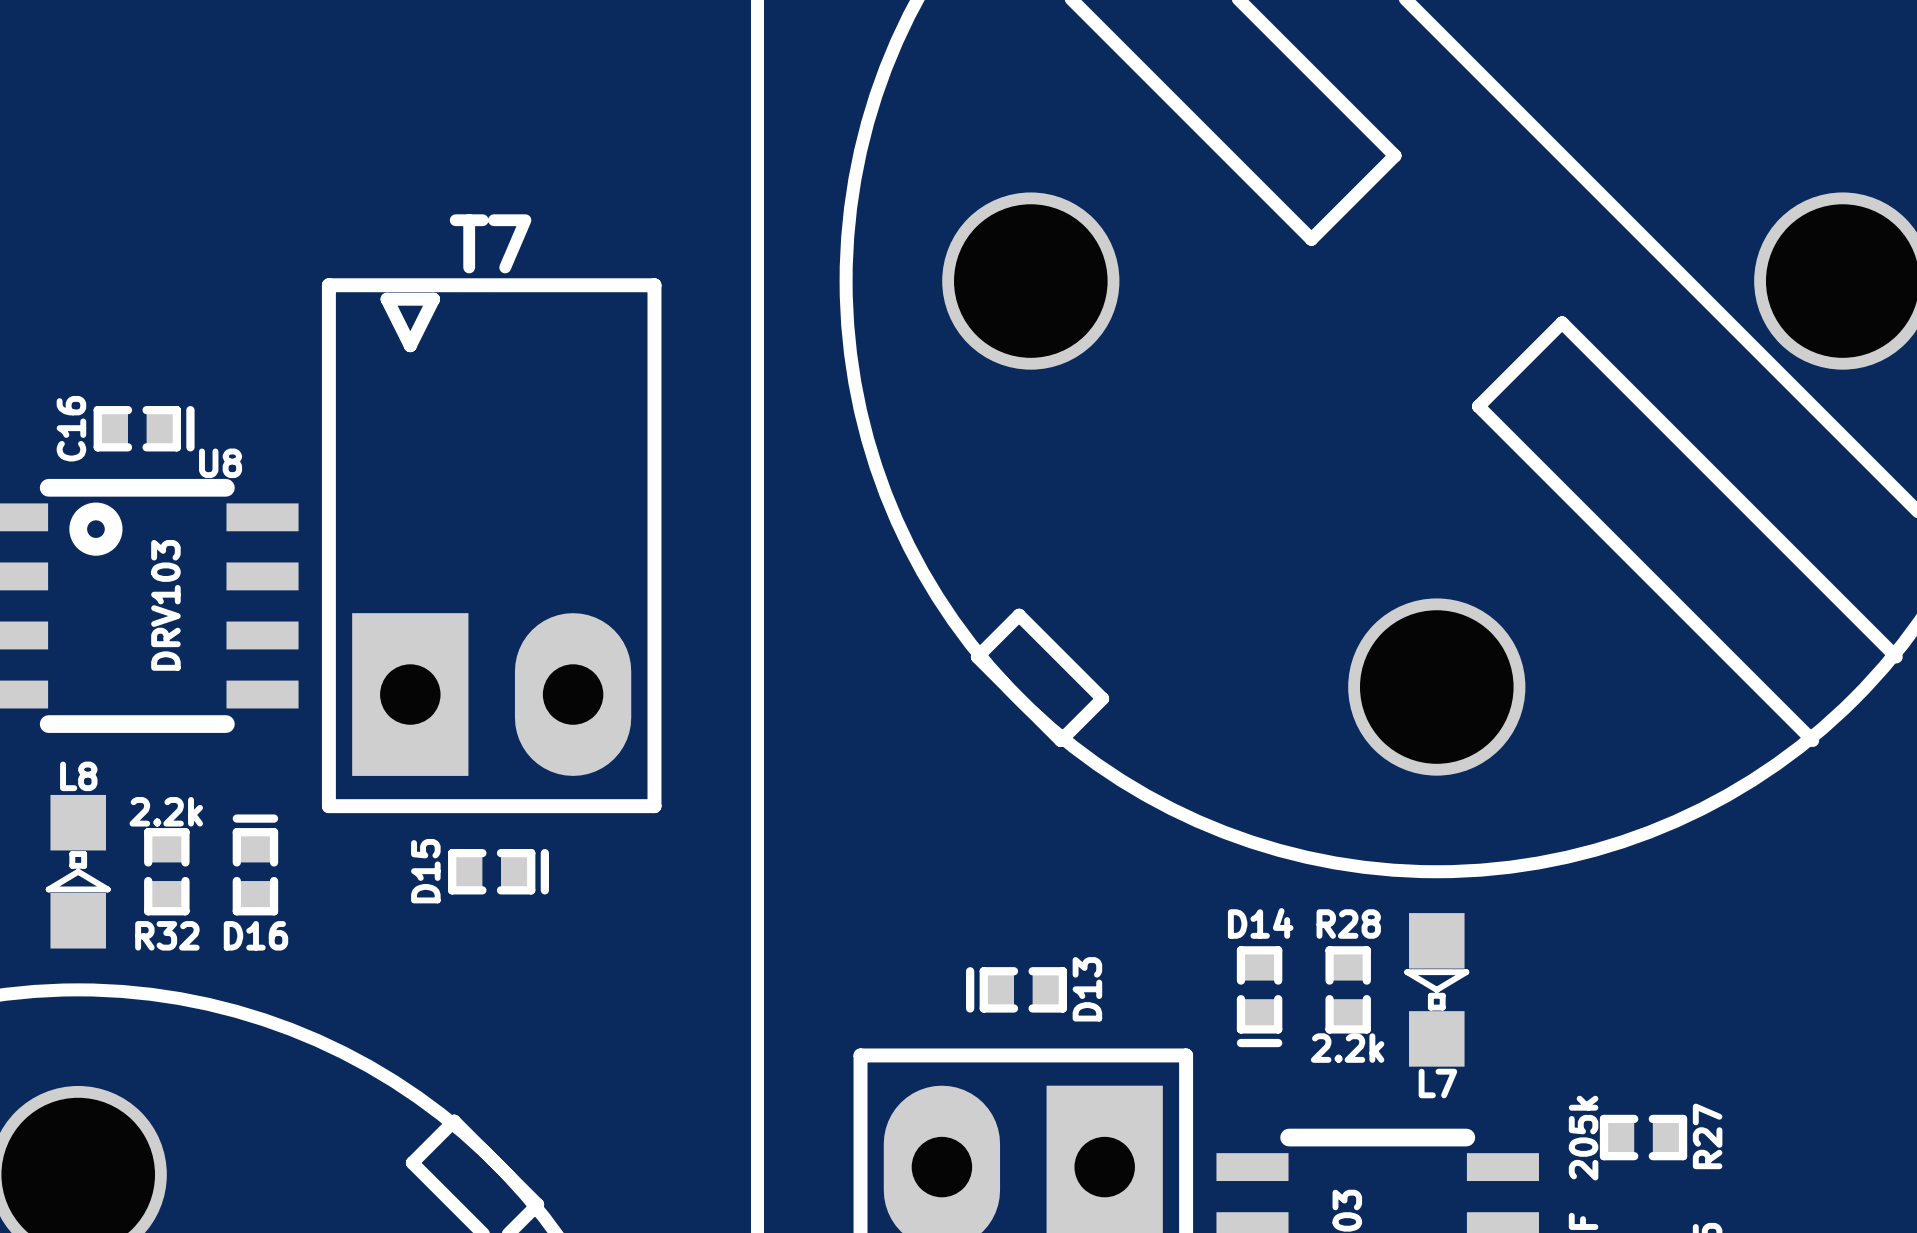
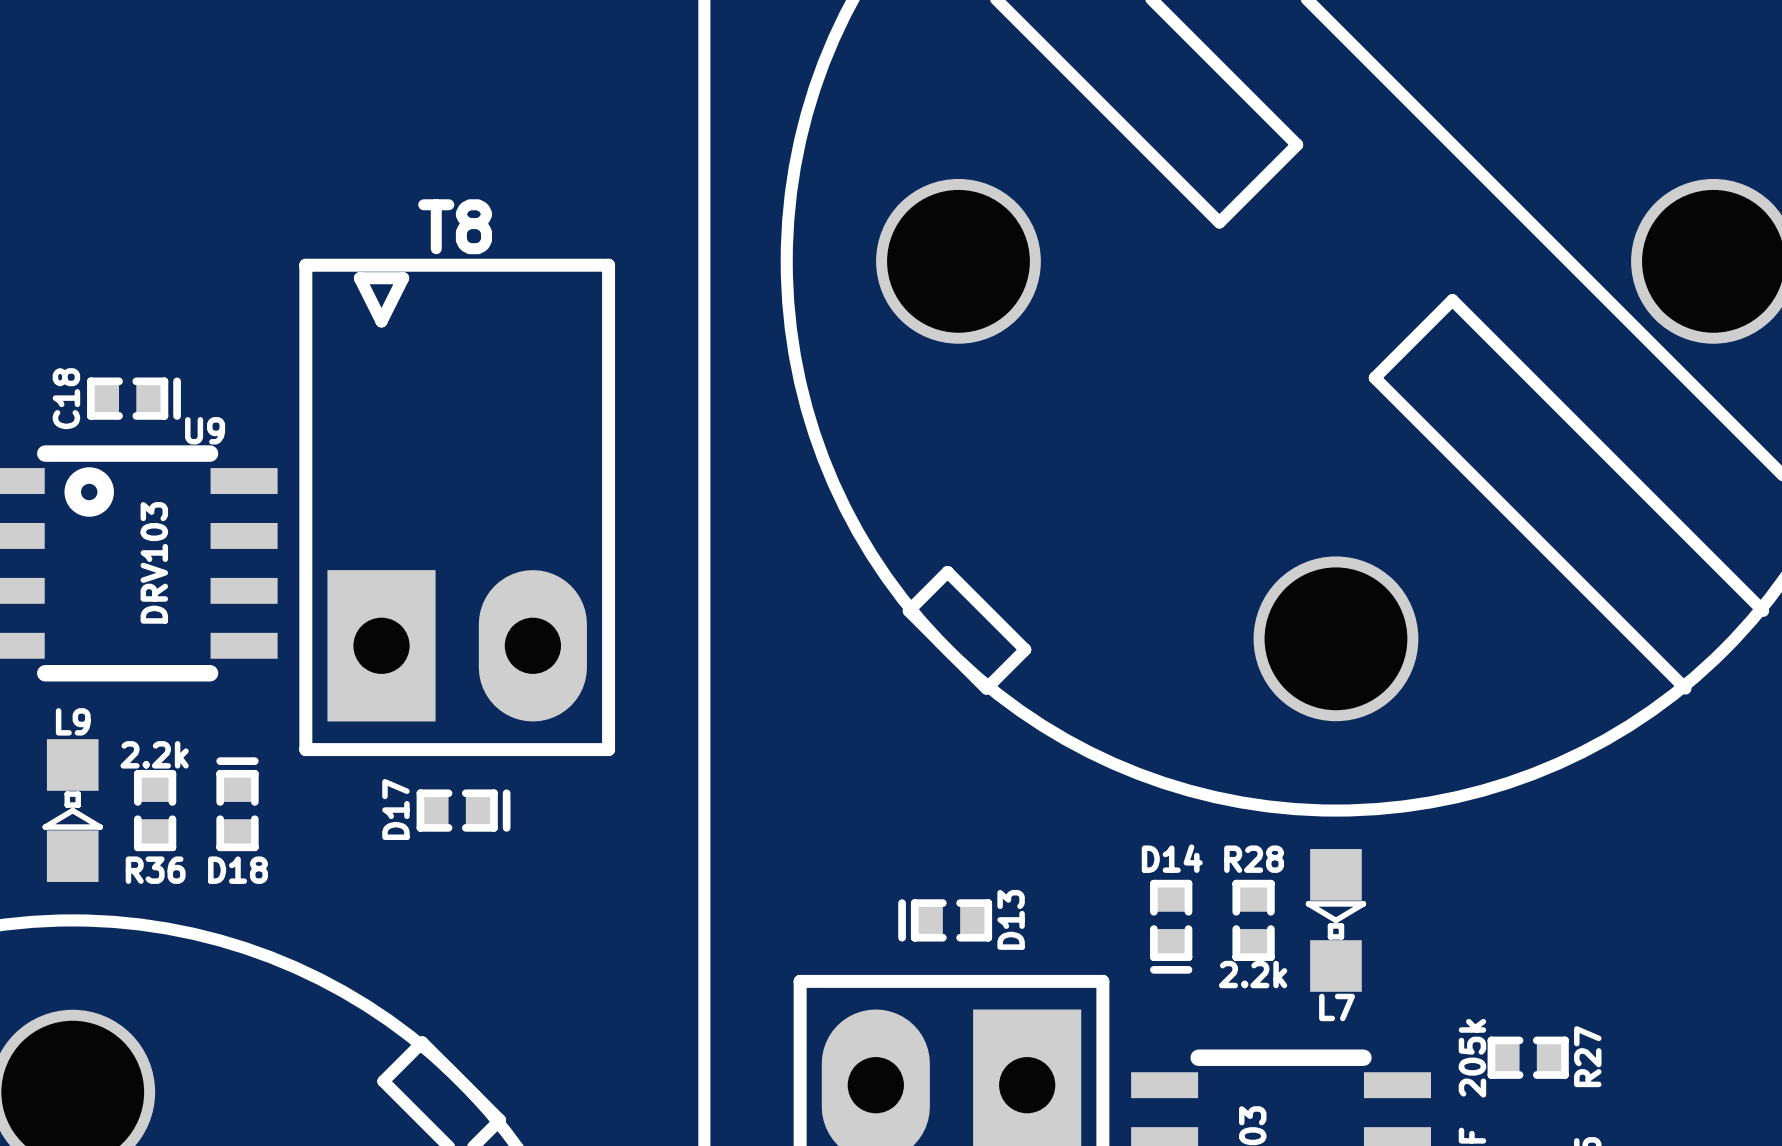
T7 name: T7 (490, 243) -> T8 (455, 226)
C16 name: C16 (71, 428) -> C18 (66, 398)
U8 name: U8 (220, 463) -> U9 (205, 430)
L8 name: L8 (78, 776) -> L9 (73, 721)
D15 name: D15 (425, 871) -> D17 (395, 809)
R32 name: R32 (167, 935) -> R36 (155, 870)
D16 name: D16 (255, 935) -> D18 (238, 870)

